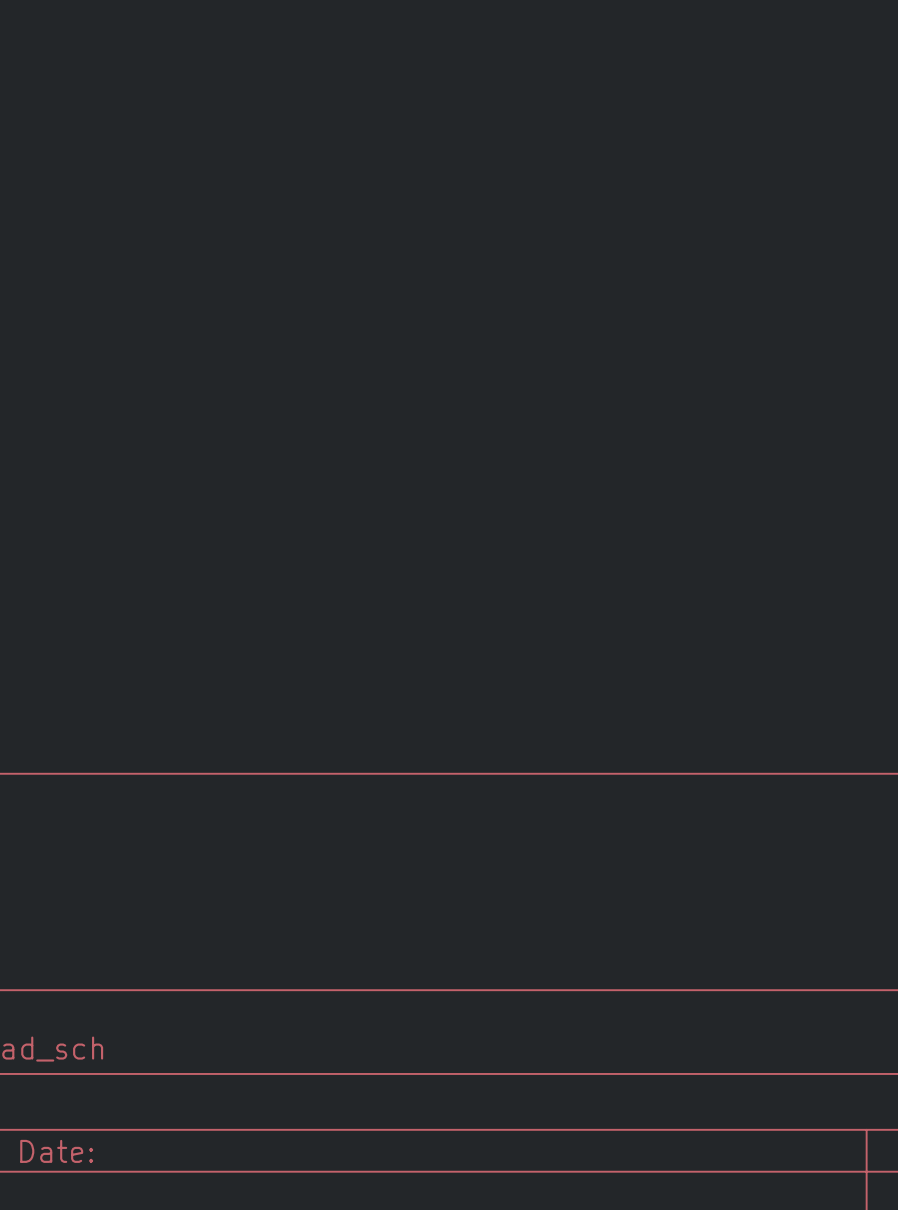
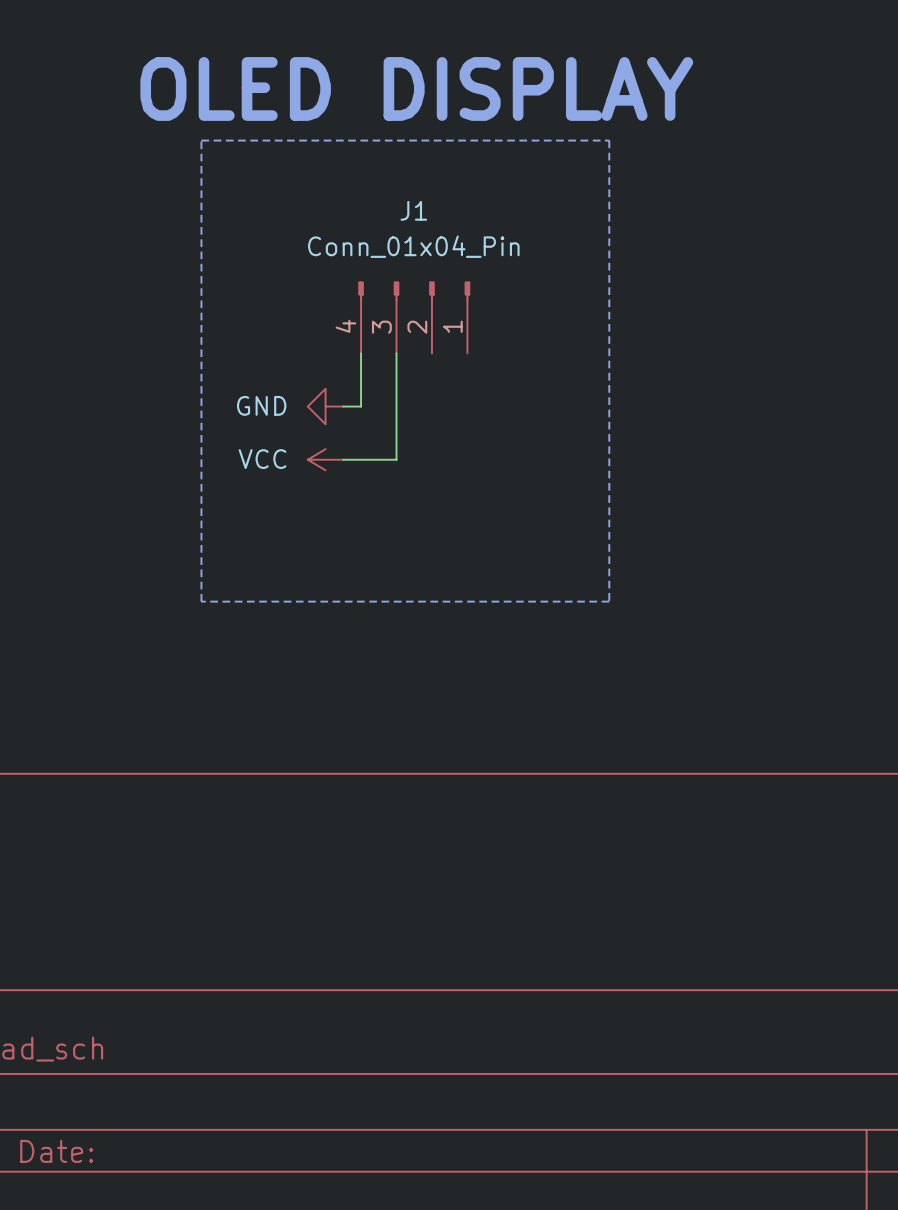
text: none -> OLED DISPLAY (416, 88)
line: none -> (201, 140) (609, 140) (609, 601) (201, 601) (201, 140)
J1: none -> Conn_01x04_Pin (414, 317)
wire: none -> (361, 353) (361, 406) (343, 406)
wire: none -> (396, 353) (396, 459) (343, 459)
power symbol: none -> GND (325, 406)
power symbol: none -> VCC (325, 459)

